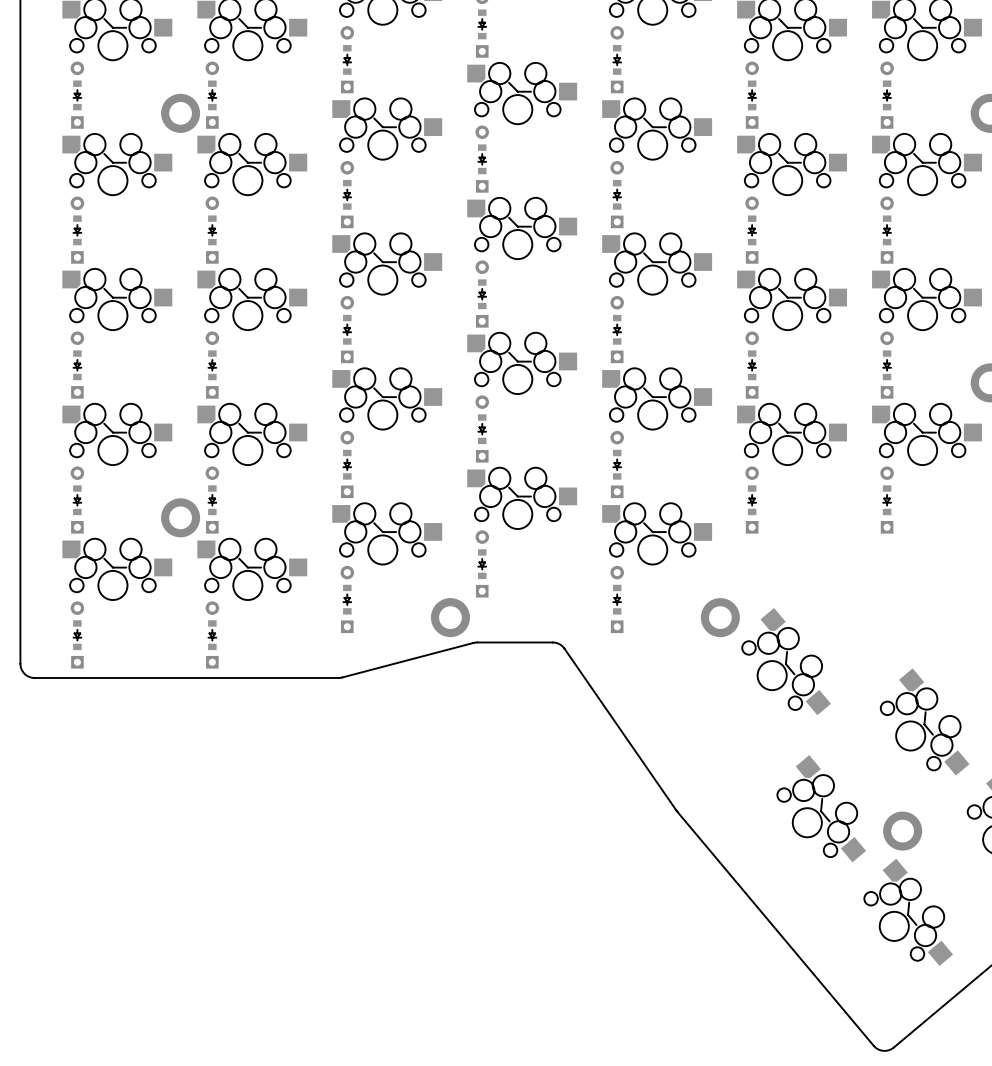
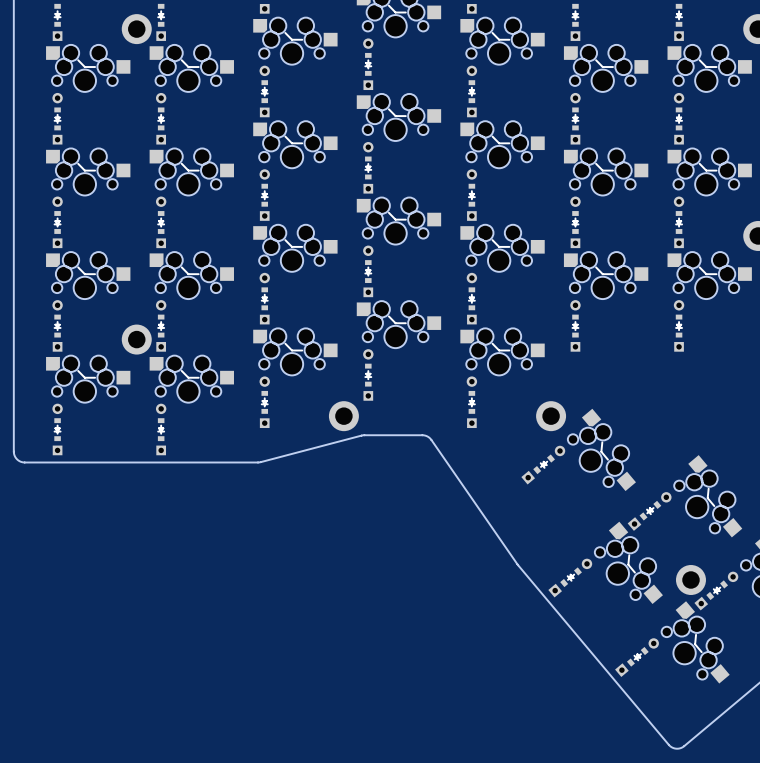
part: none -> (543, 465)
part: none -> (649, 511)
part: none -> (570, 578)
part: none -> (716, 591)
part: none -> (637, 657)

